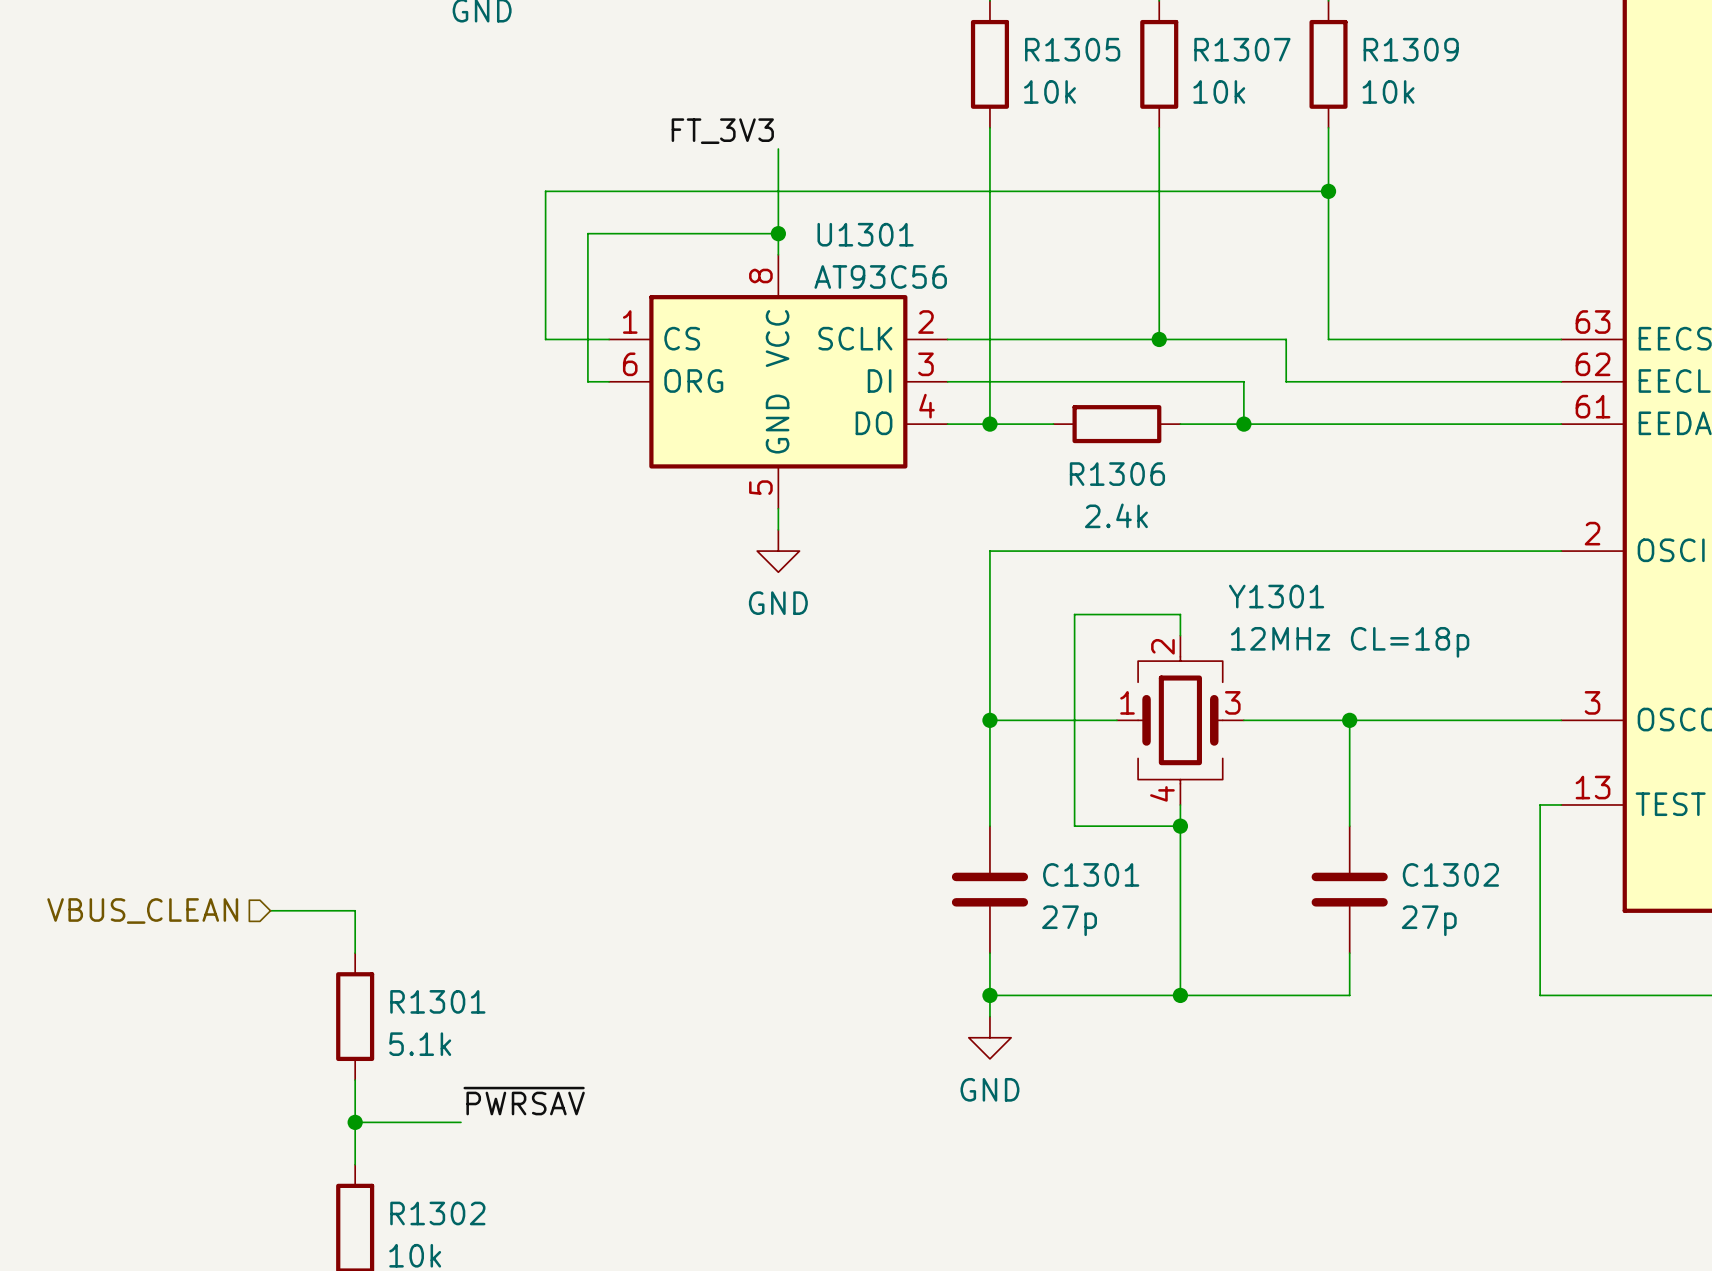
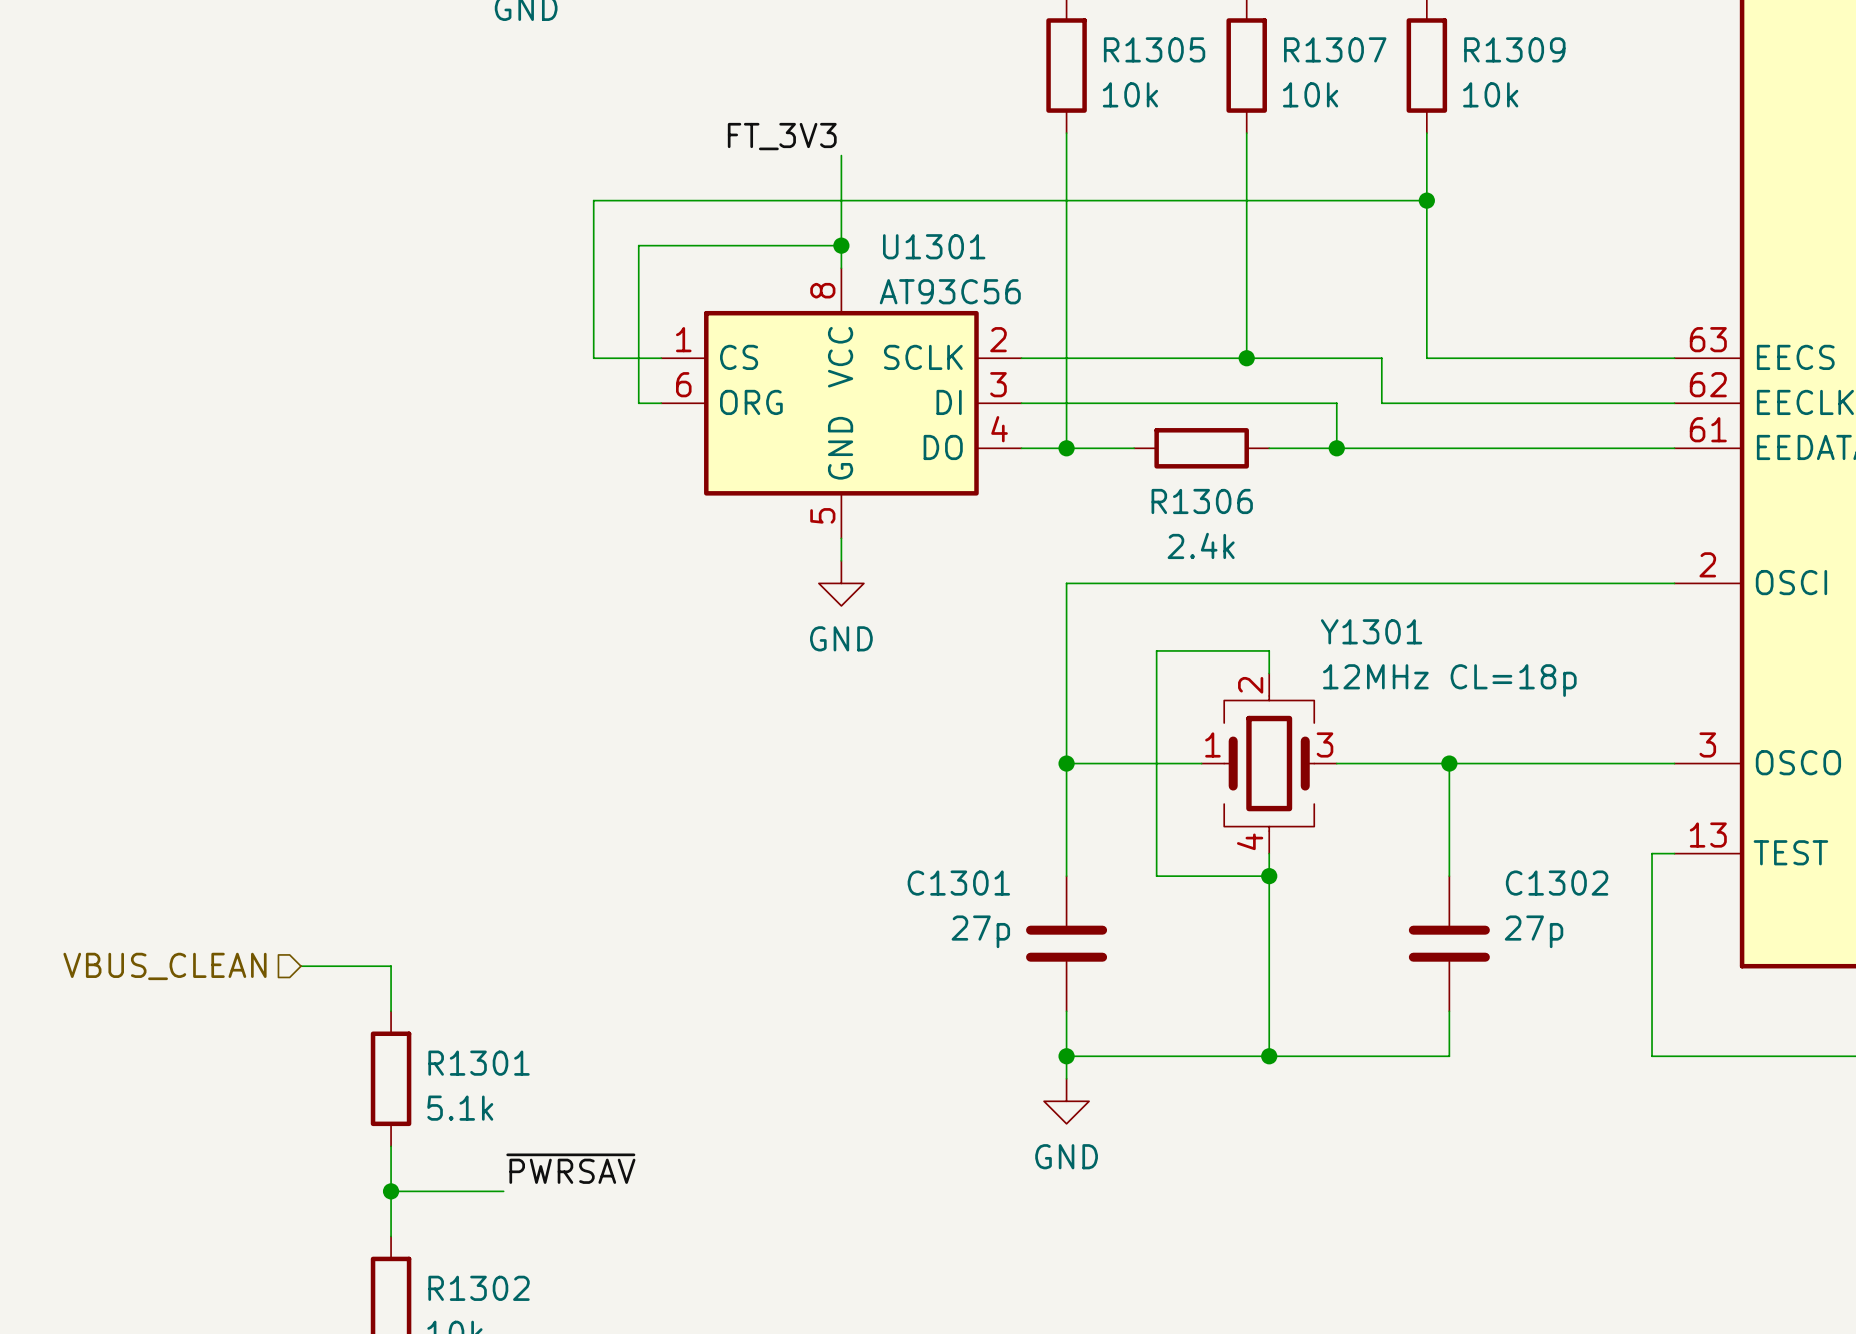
C1301 name position: C1301 (1091, 874) -> C1301 (958, 883)
C1302 name position: C1302 (1450, 874) -> C1302 (1557, 883)
C1301 value position: 27p (1069, 920) -> 27p (980, 931)
C1302 value position: 27p (1429, 920) -> 27p (1534, 931)

